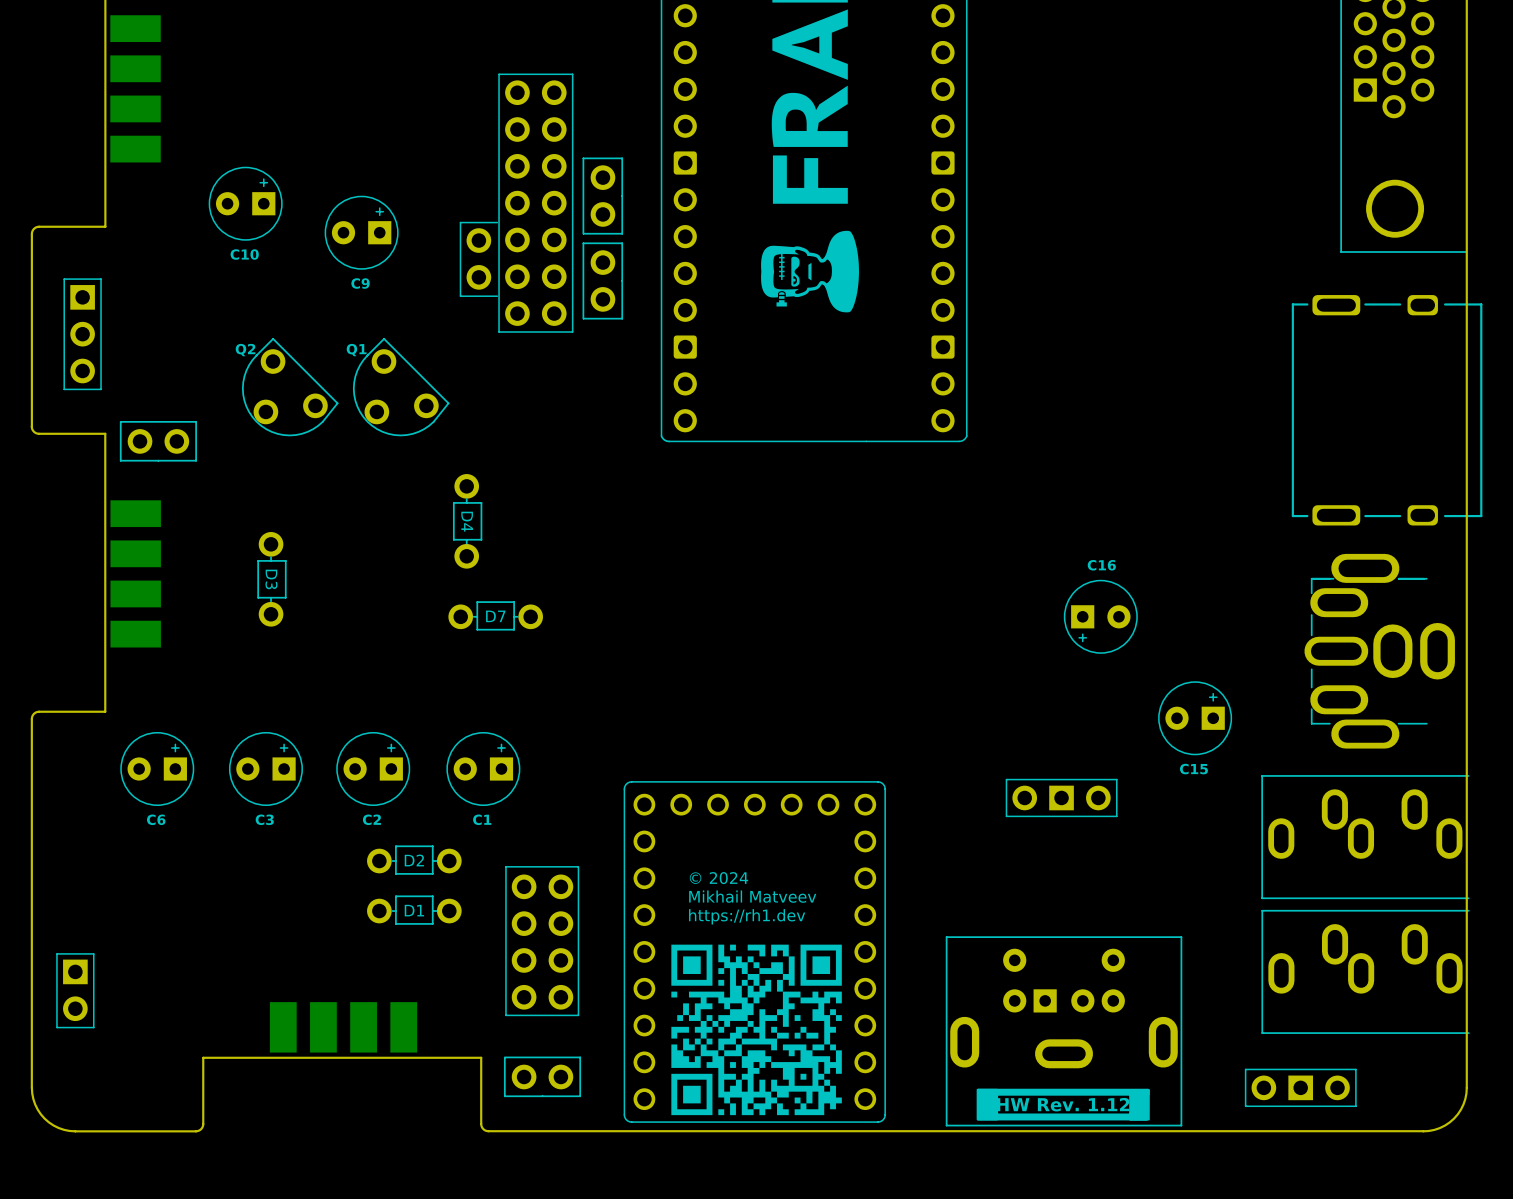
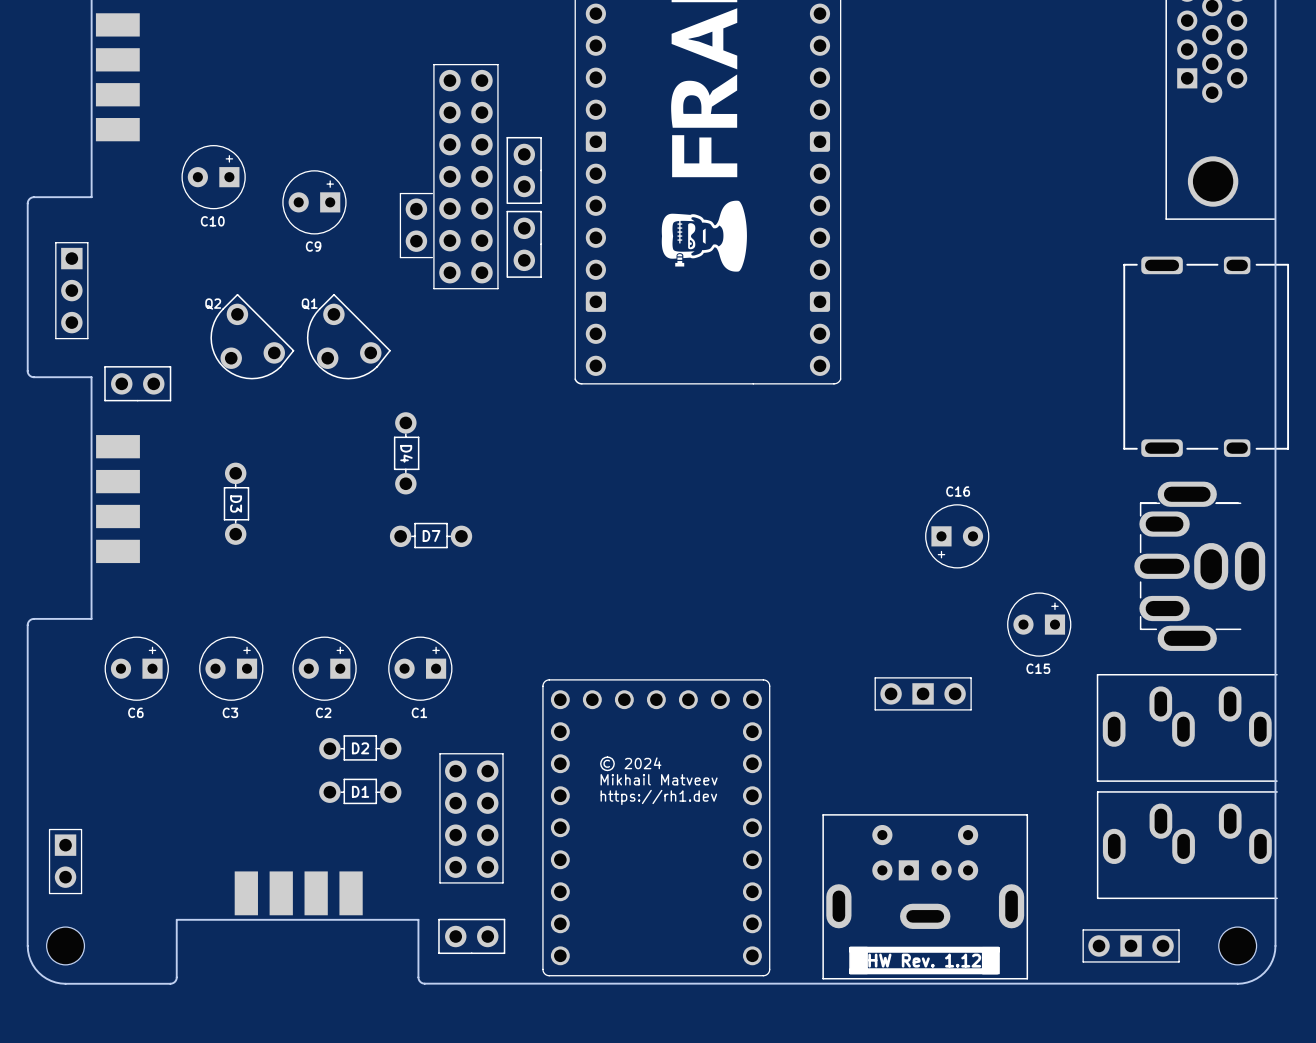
drawing: [671, 944, 842, 1116] -> none
part: none -> (65, 945)
part: none -> (1237, 945)

